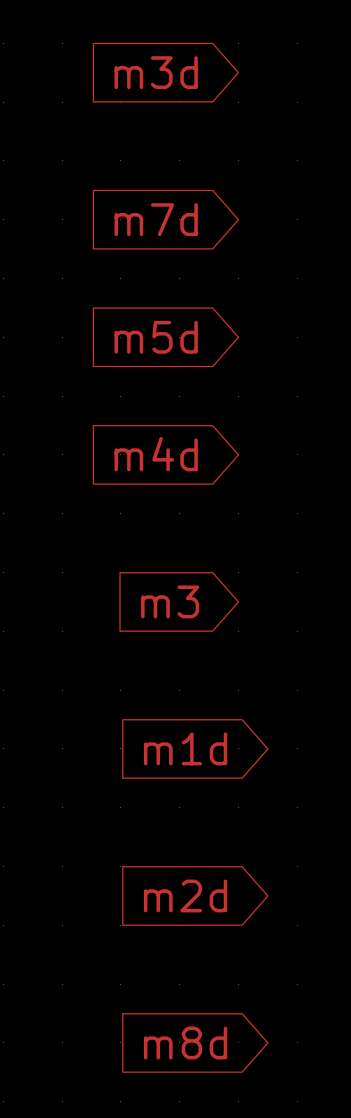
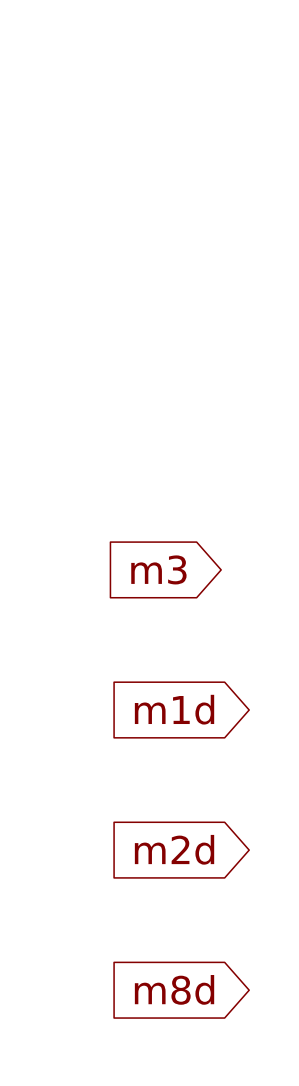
global label: m3d (156, 72) -> none
global label: m7d (156, 219) -> none
global label: m5d (156, 337) -> none
global label: m4d (156, 454) -> none

